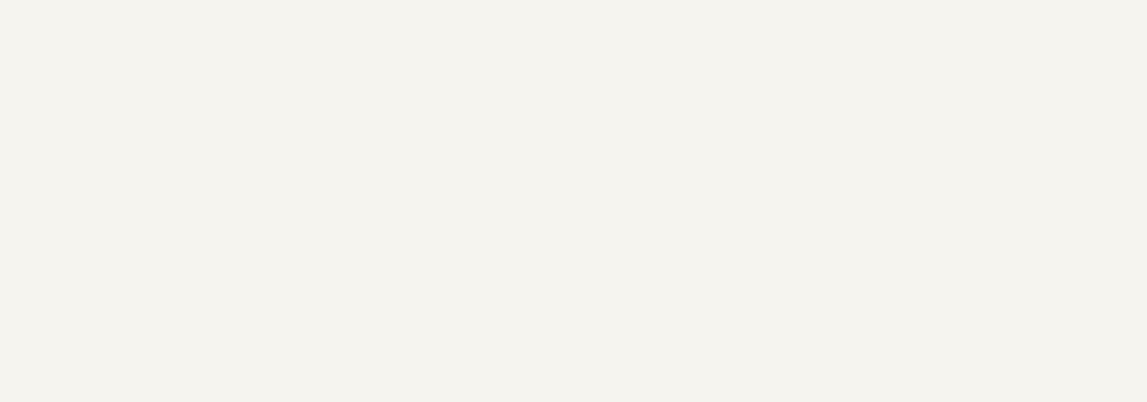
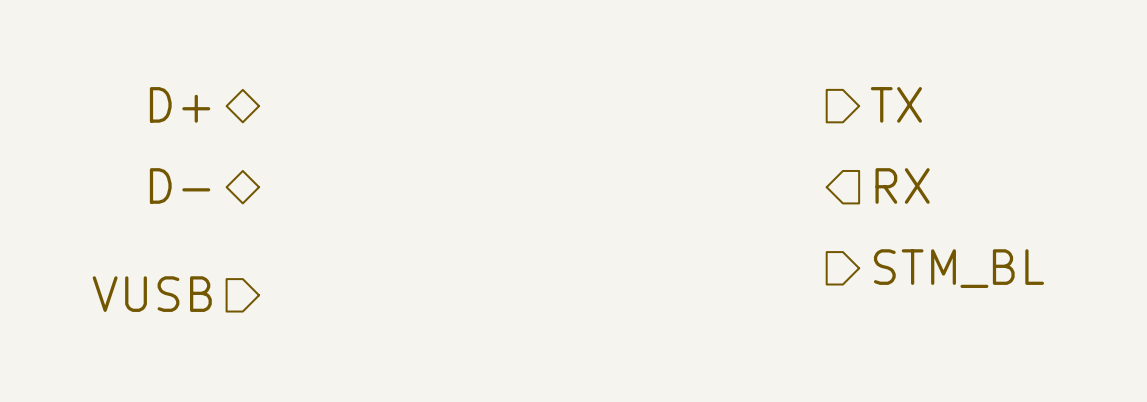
hierarchical label: none -> D+ (180, 104)
hierarchical label: none -> TX (896, 104)
hierarchical label: none -> D- (180, 185)
hierarchical label: none -> RX (902, 185)
hierarchical label: none -> STM_BL (958, 268)
hierarchical label: none -> VUSB (152, 294)

